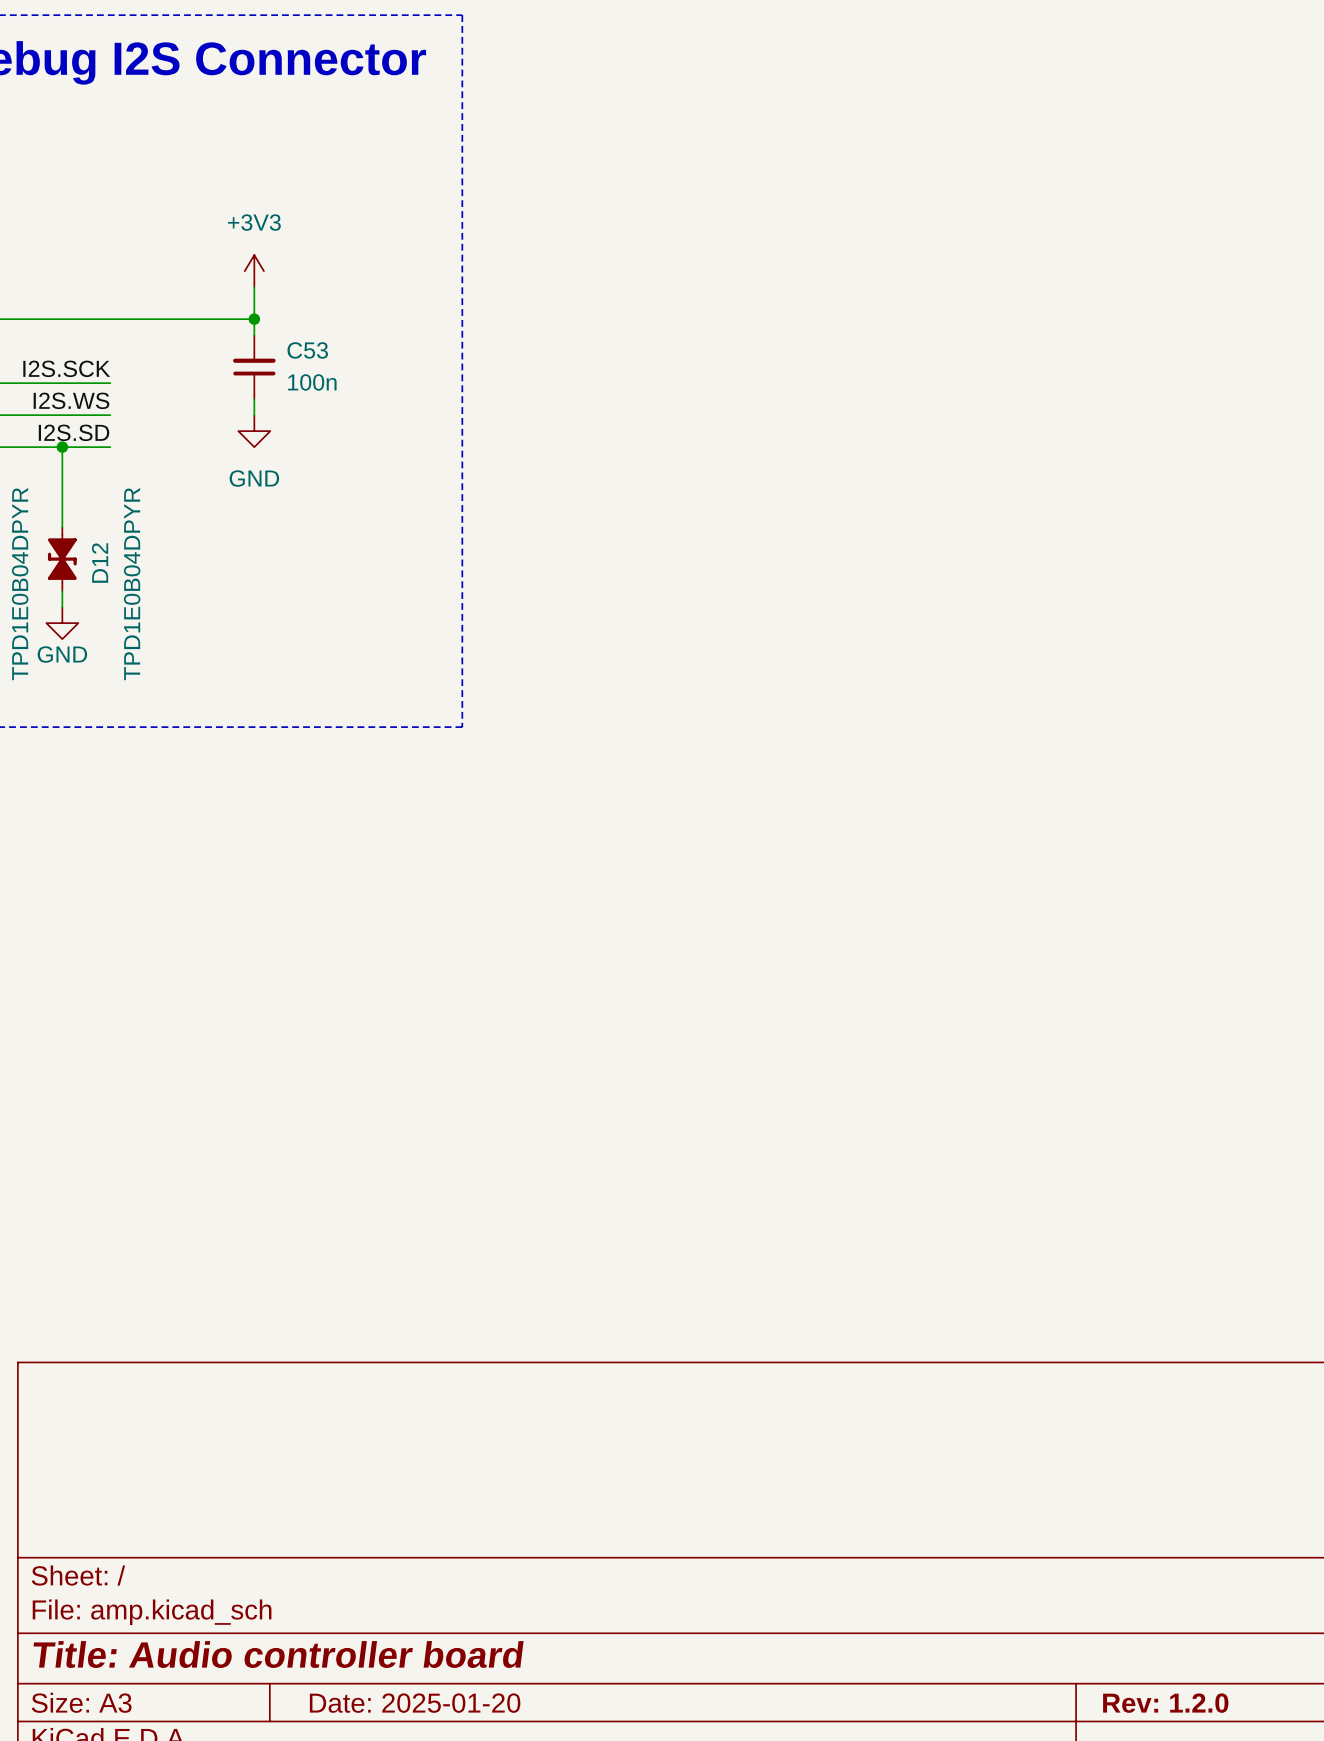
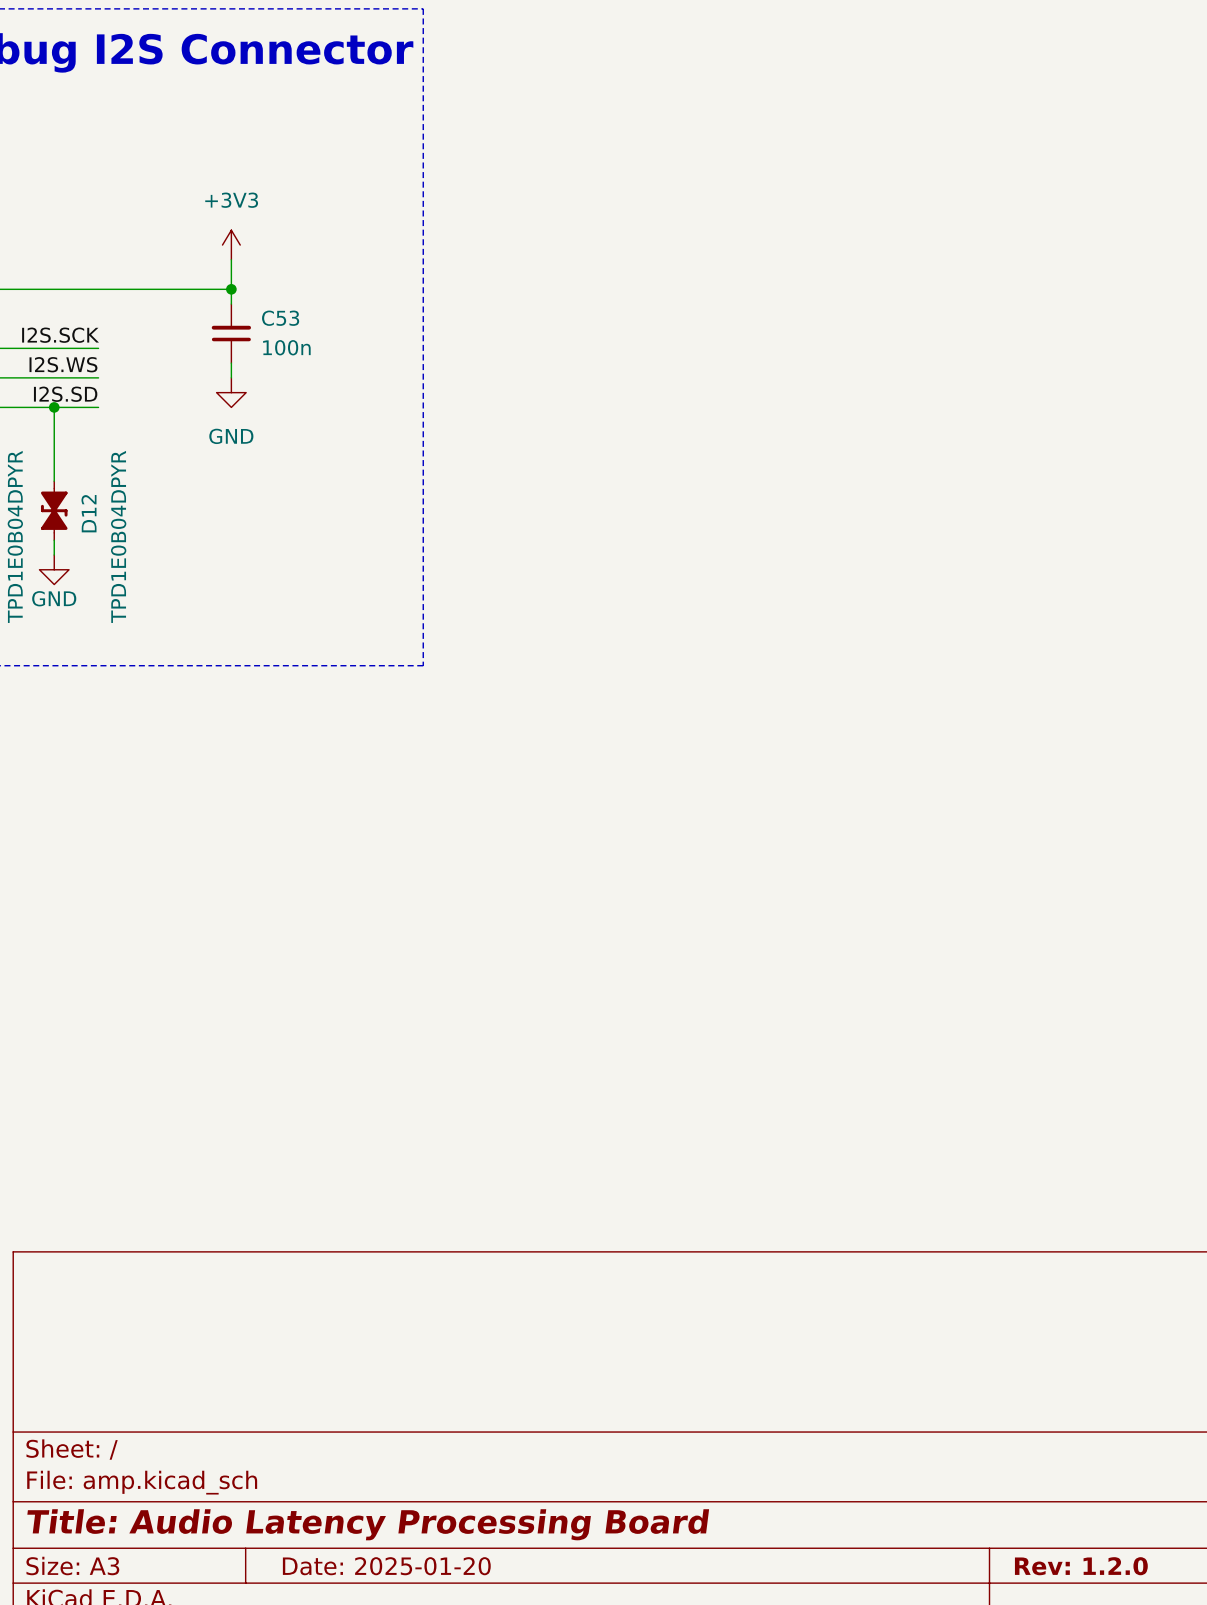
title block: Title: Audio controller board (278, 1654) -> Title: Audio Latency Processing Board (368, 1524)

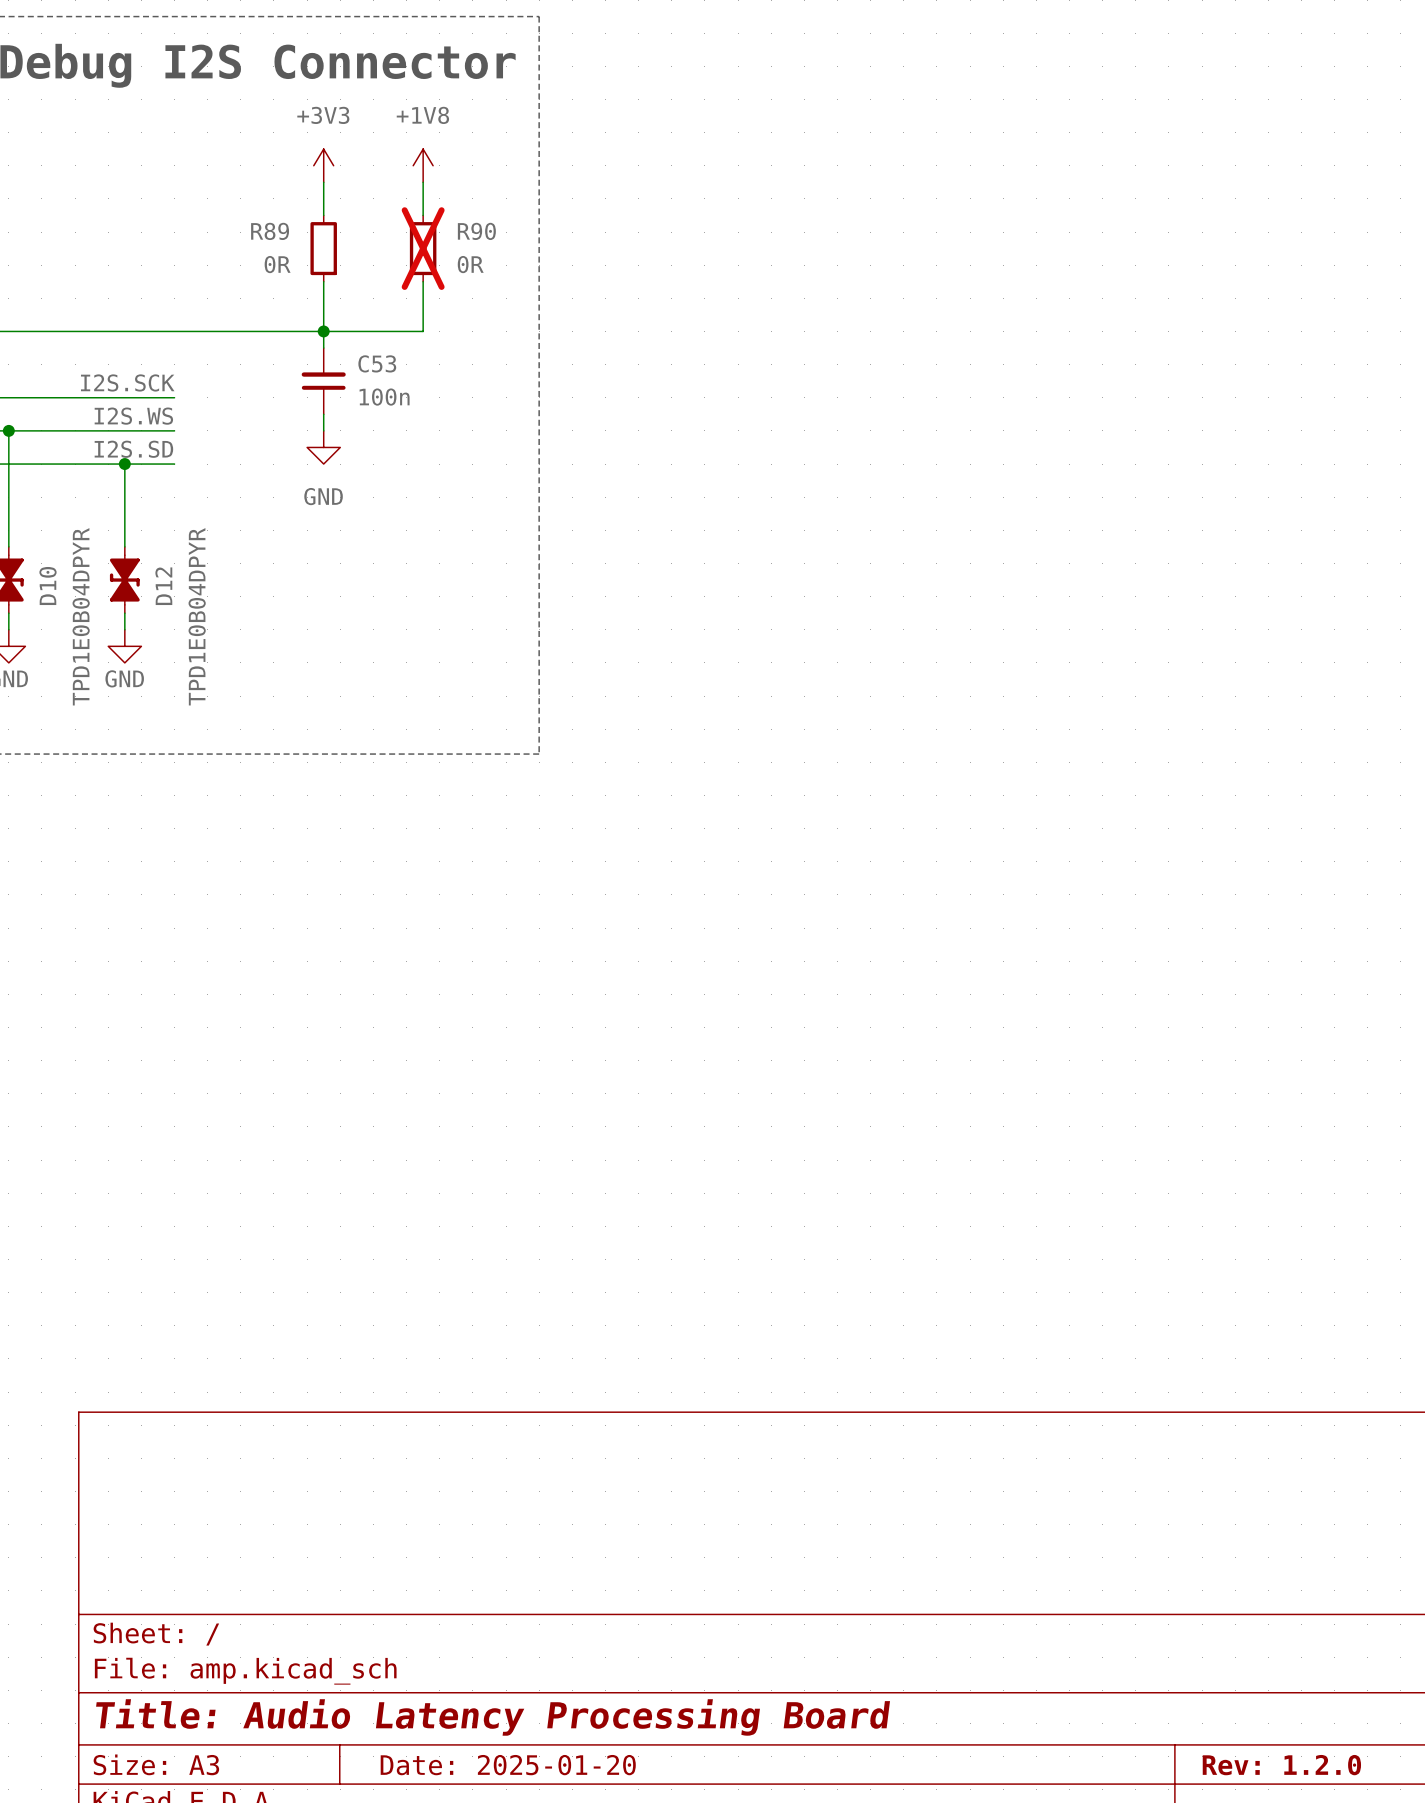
power symbol: none -> +1V8 (423, 165)
wire: none -> (323, 182) (323, 215)
wire: none -> (423, 182) (423, 215)
R89: none -> (323, 248)
R90: none -> (423, 248)
power symbol position: +3V3 (231, 245) -> +3V3 (323, 165)
wire: none -> (423, 281) (423, 331) (323, 331)

